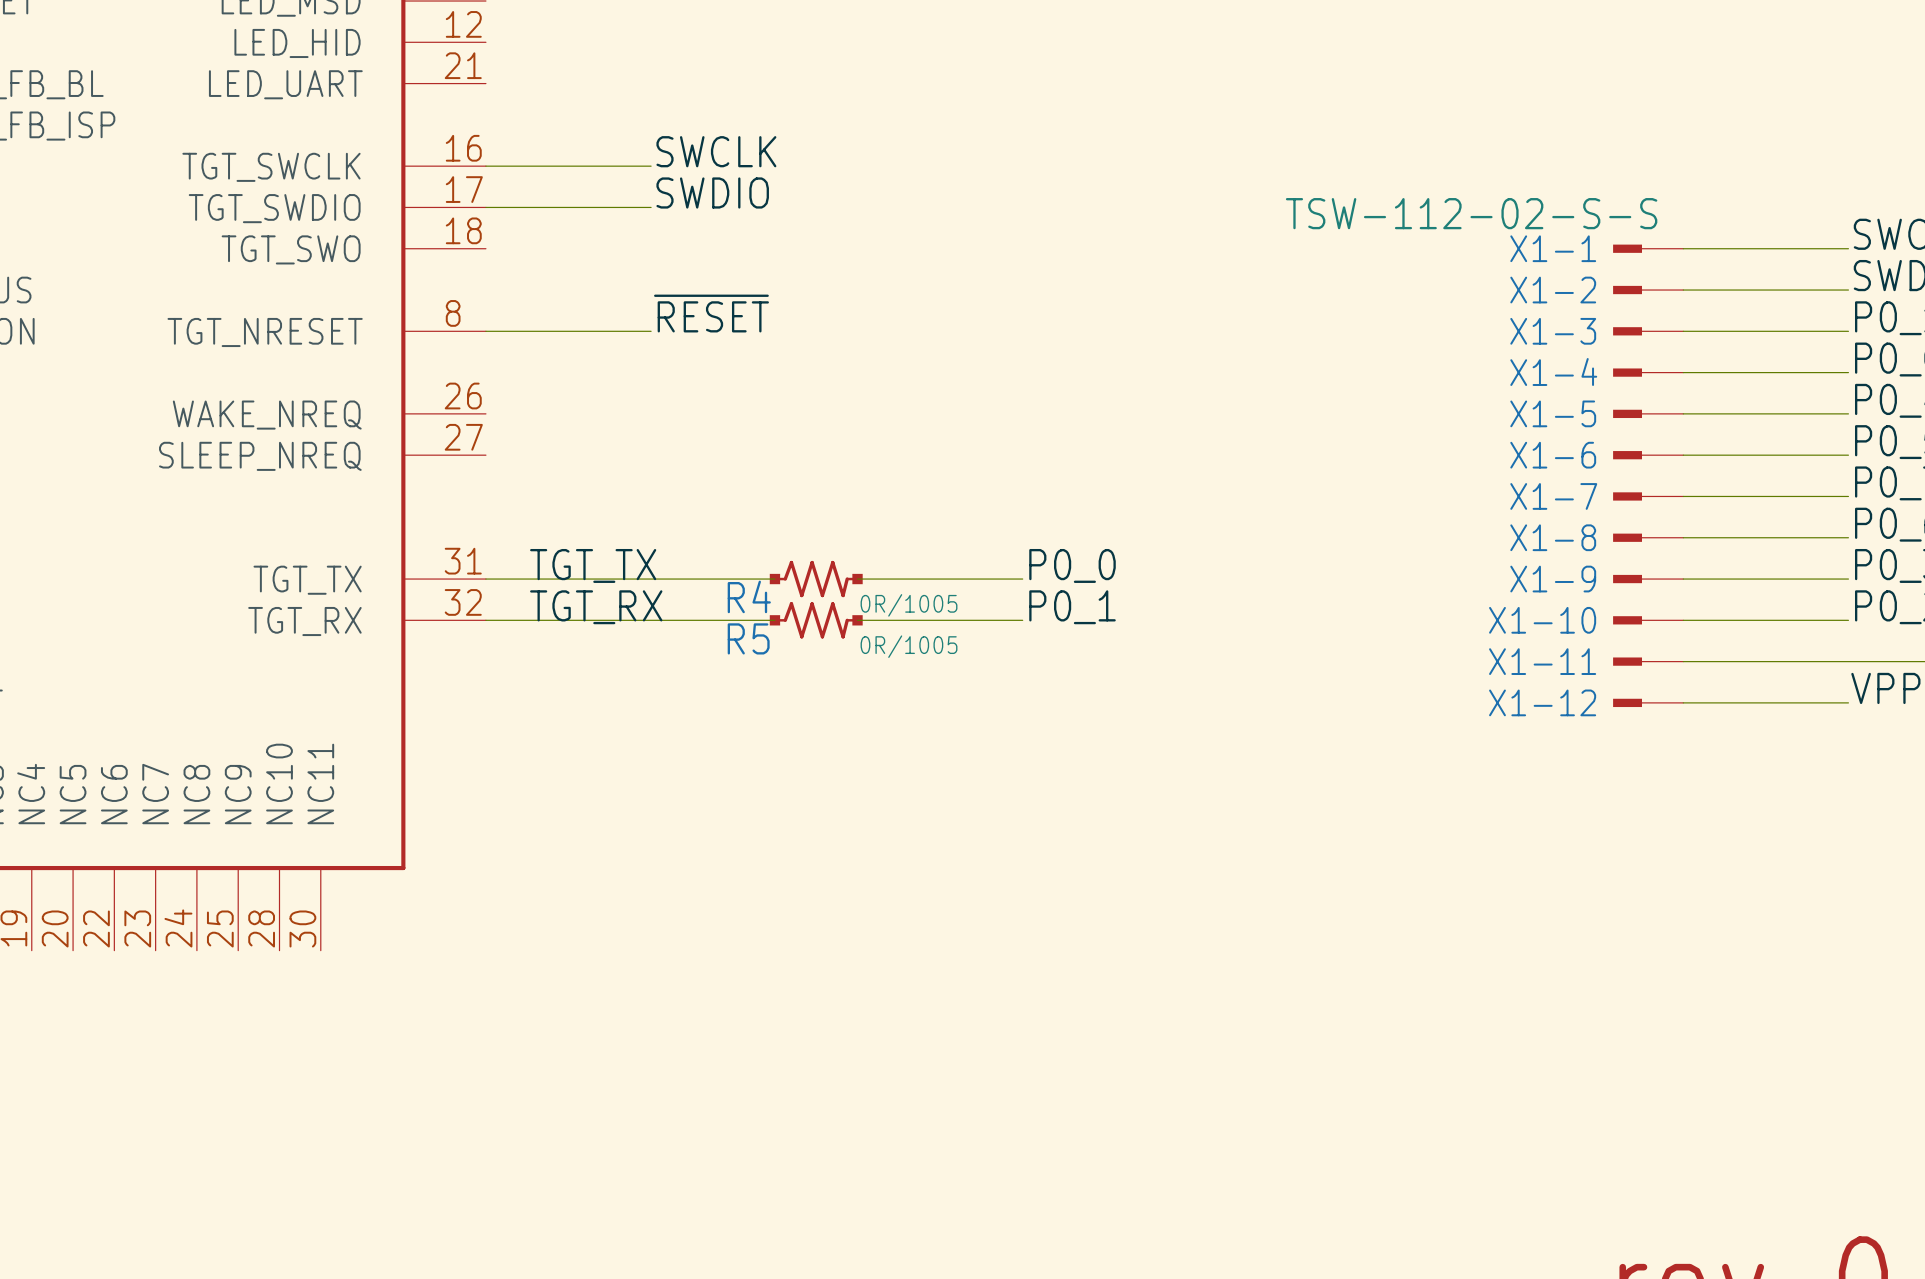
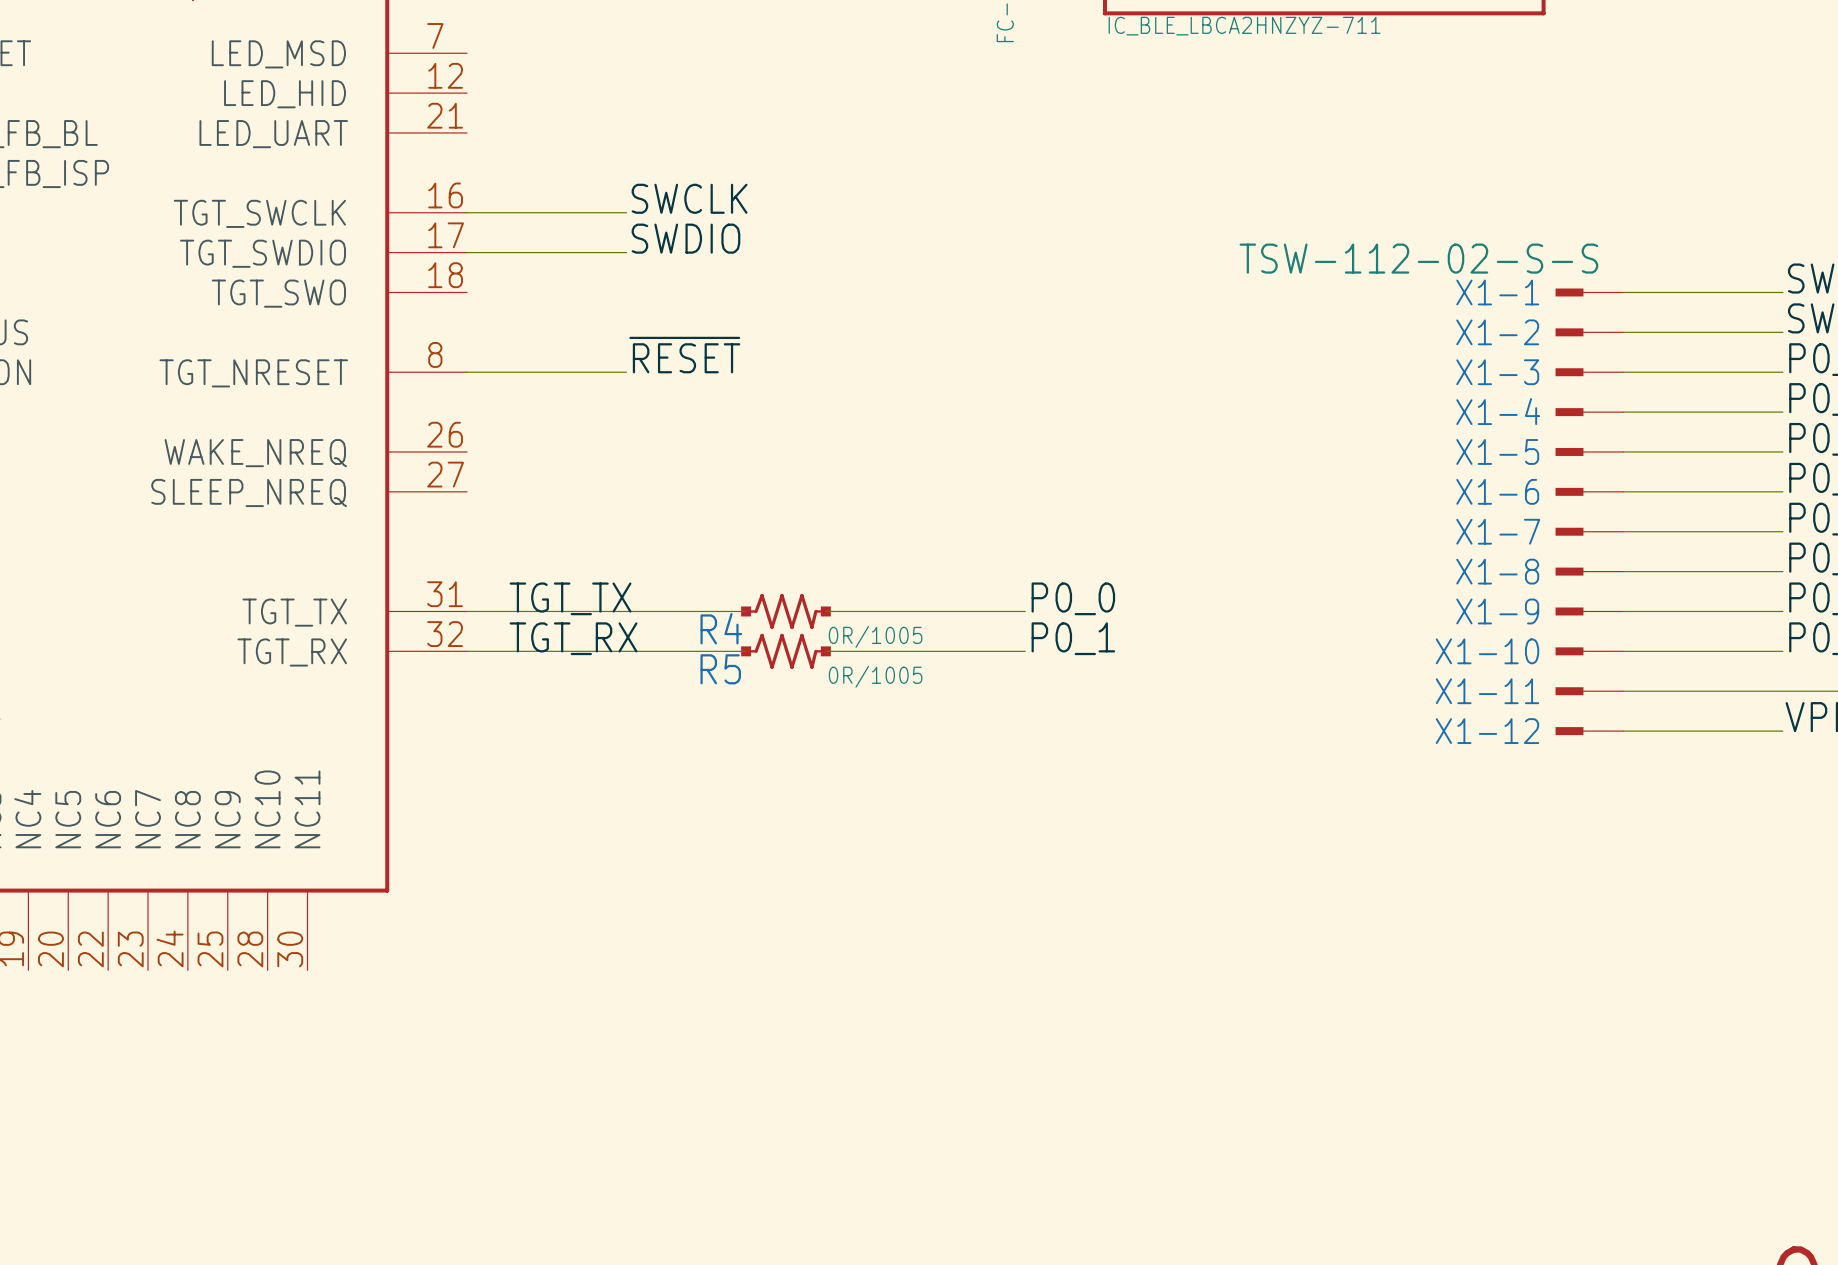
label position: P0_0 (1072, 565) -> P0_0 (1073, 598)
wire: none -> (985, 611) (1025, 611)
label position: P0_1 (1072, 607) -> P0_1 (1073, 638)
wire: none -> (985, 651) (1025, 651)

